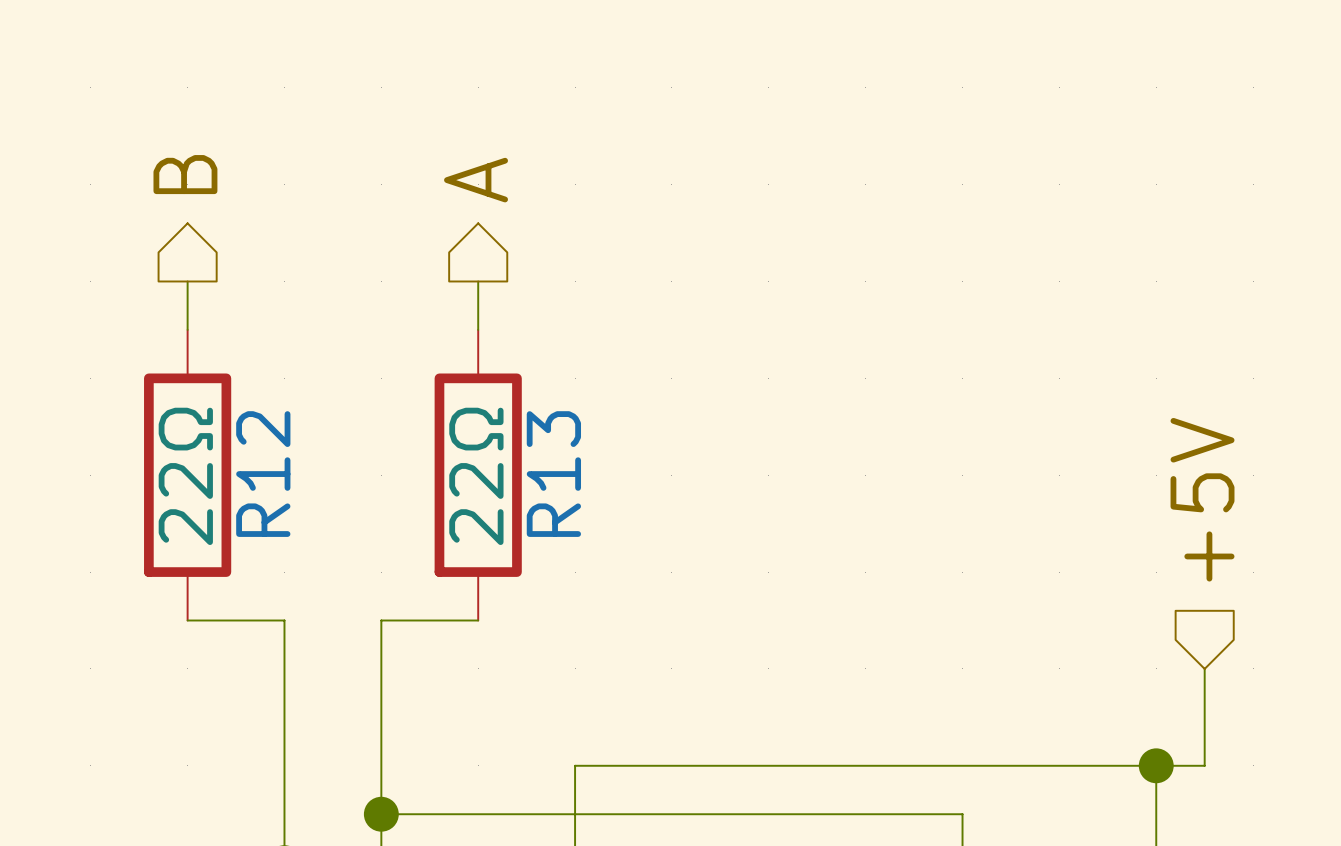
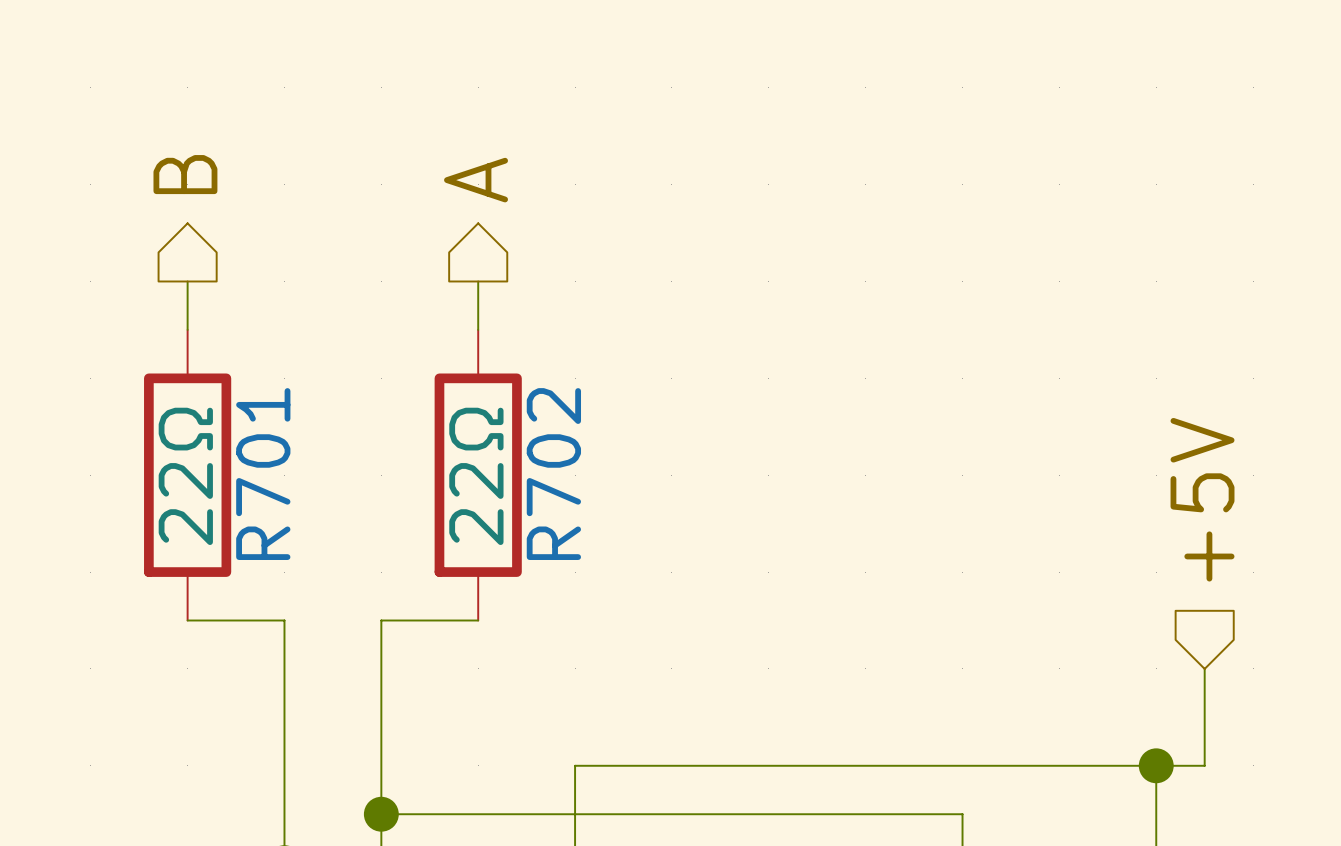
R12 name: R12 (263, 474) -> R701 (263, 474)
R13 name: R13 (553, 474) -> R702 (553, 474)

